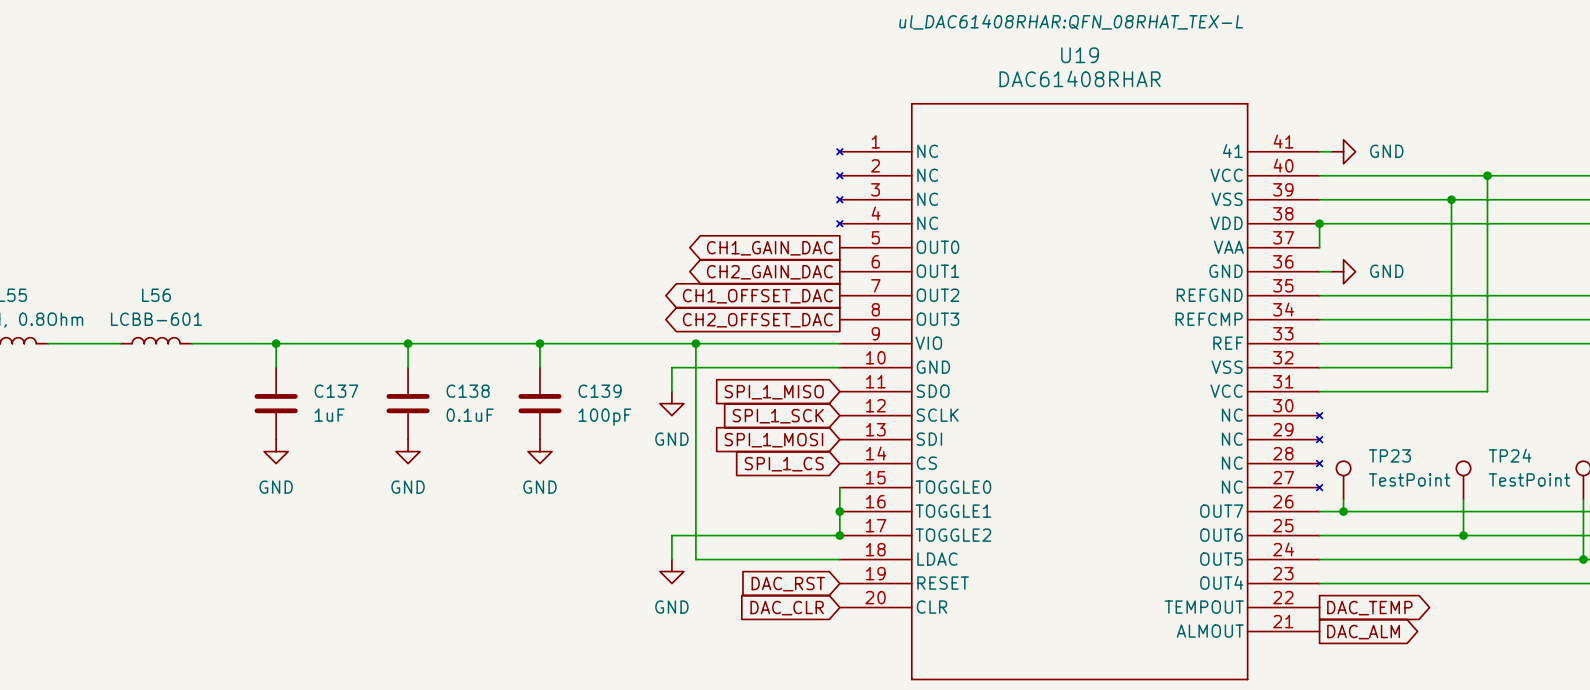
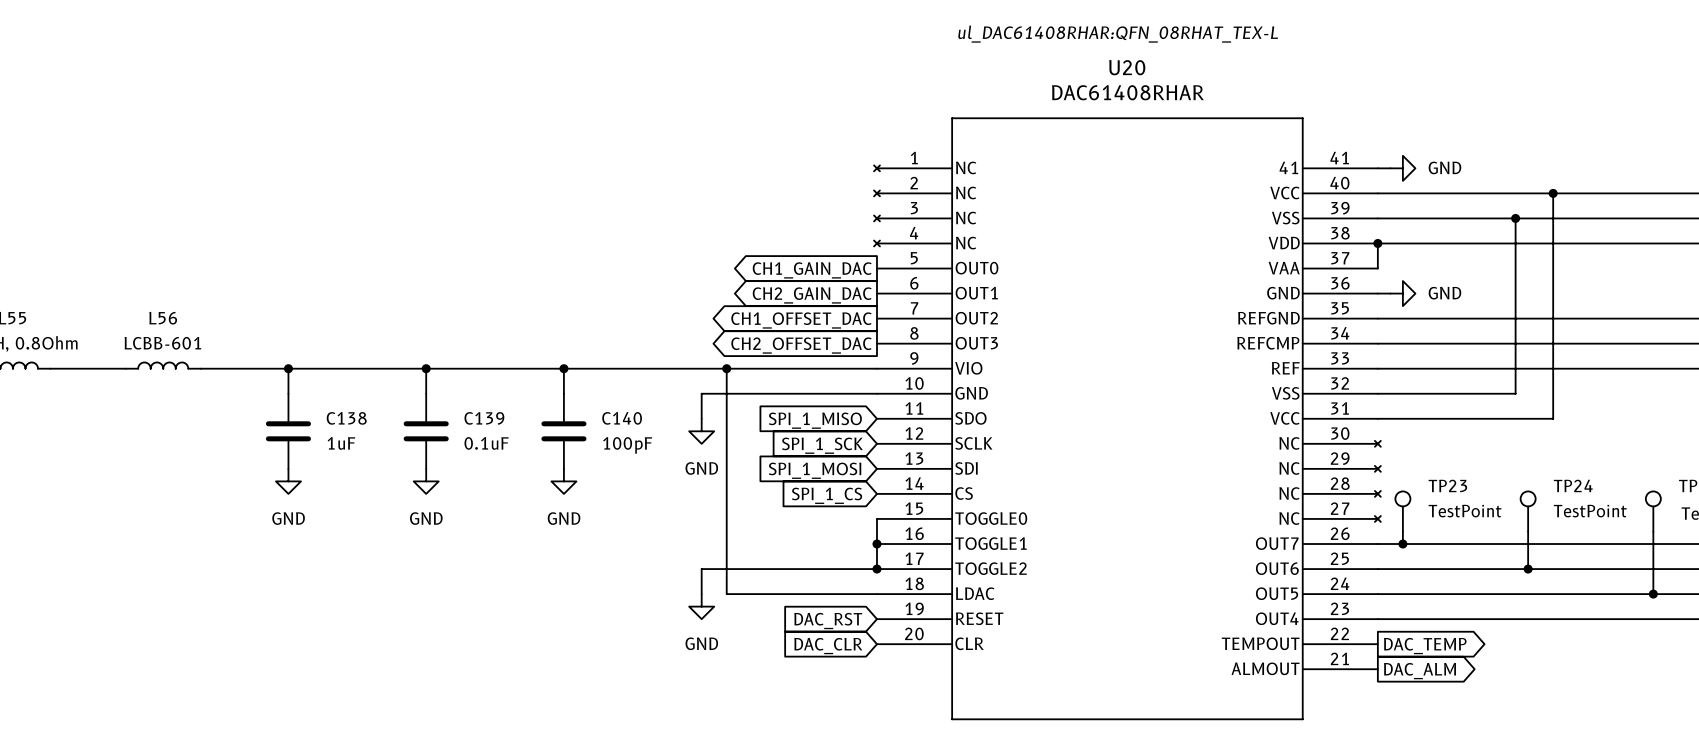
U19 name: U19 (1080, 55) -> U20 (1127, 67)
C137 name: C137 (336, 391) -> C138 (346, 418)
C138 name: C138 (468, 391) -> C139 (484, 418)
C139 name: C139 (600, 391) -> C140 (622, 418)

